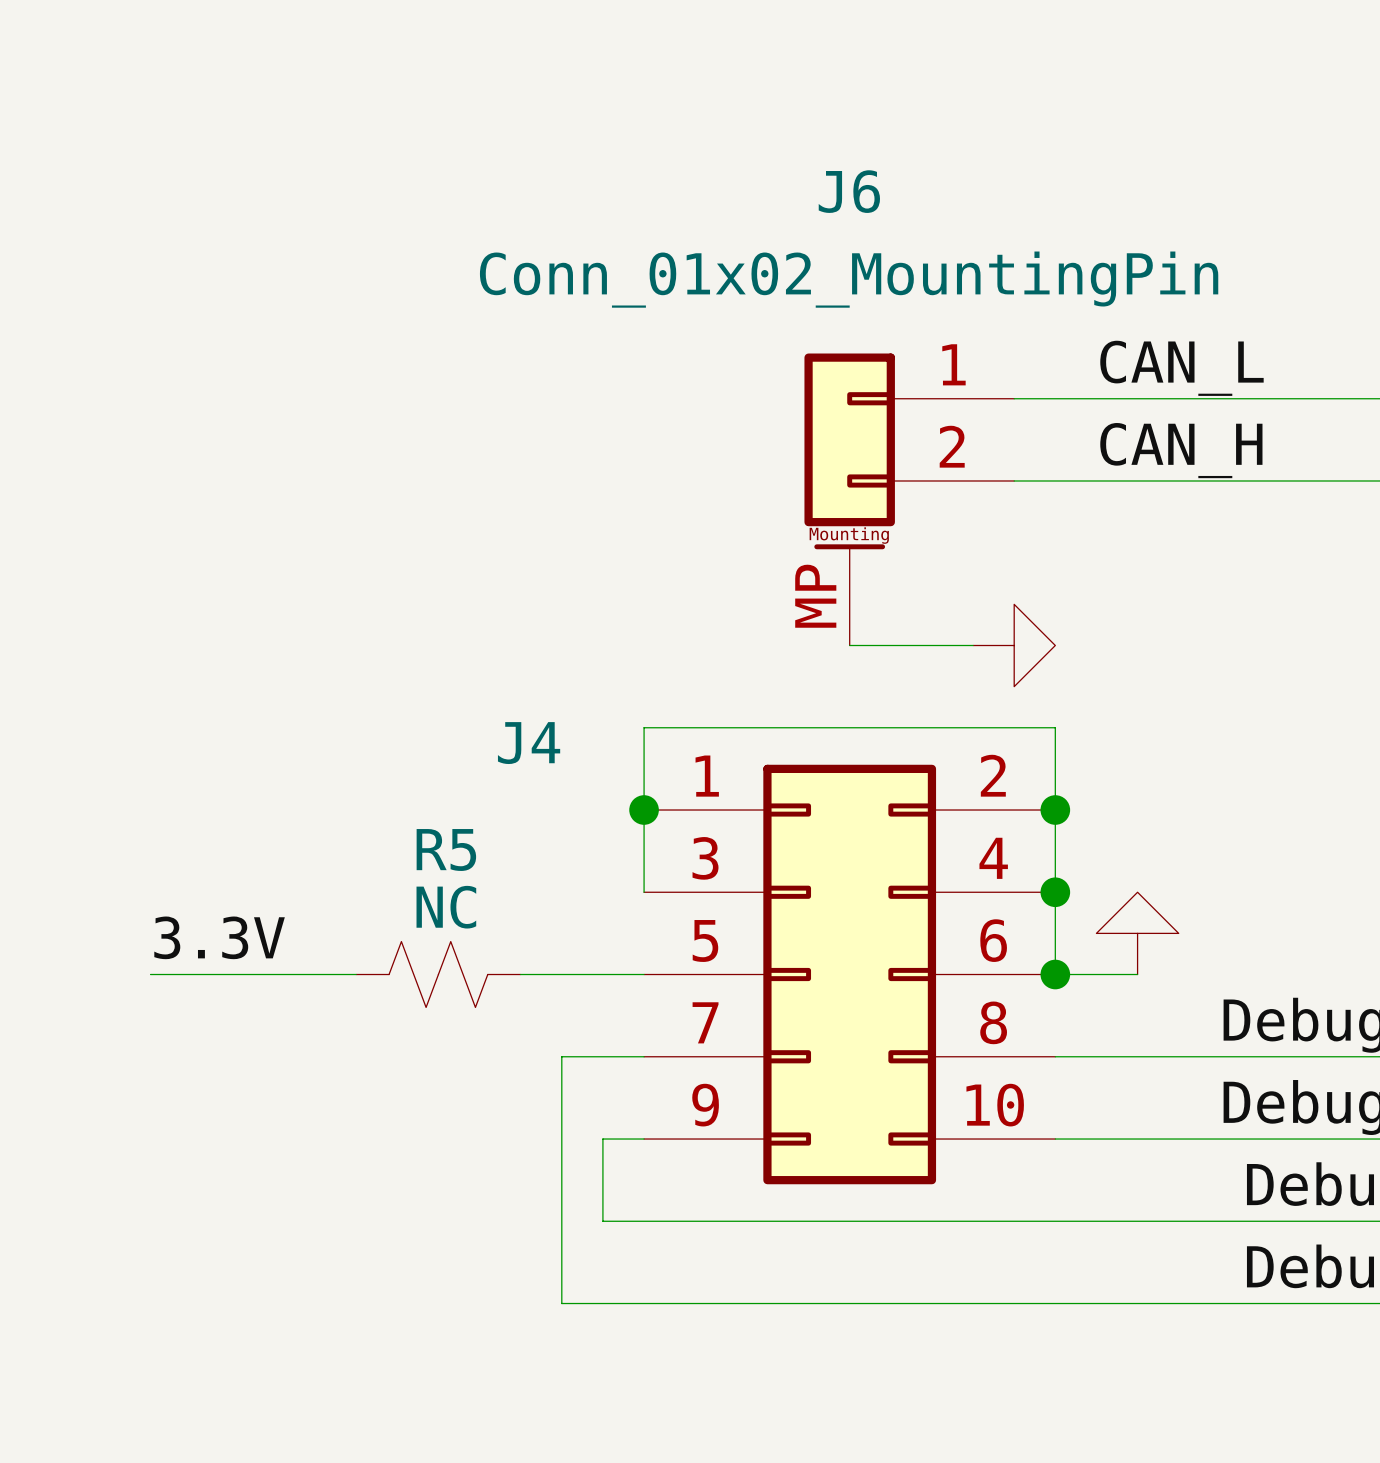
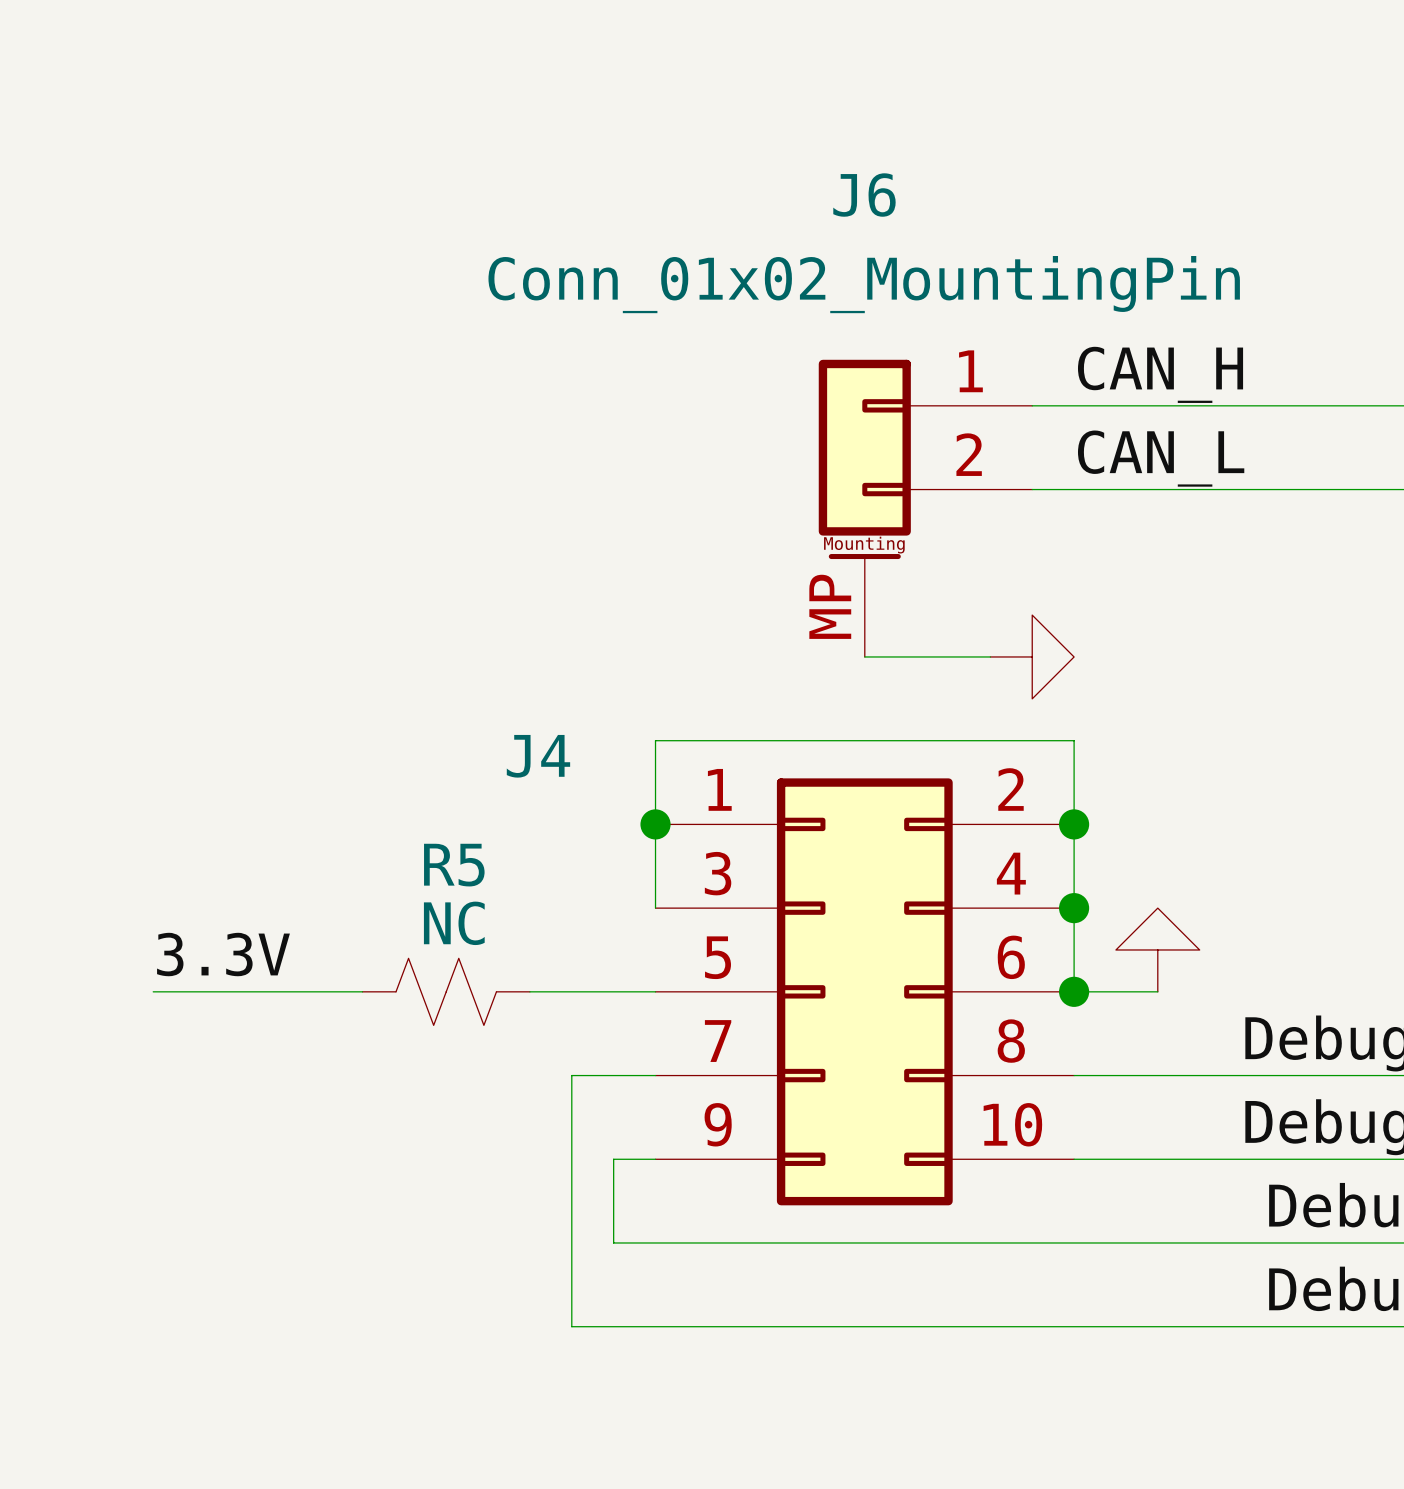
label position: CAN_L (1181, 368) -> CAN_L (1161, 458)
label position: CAN_H (1181, 450) -> CAN_H (1160, 374)

